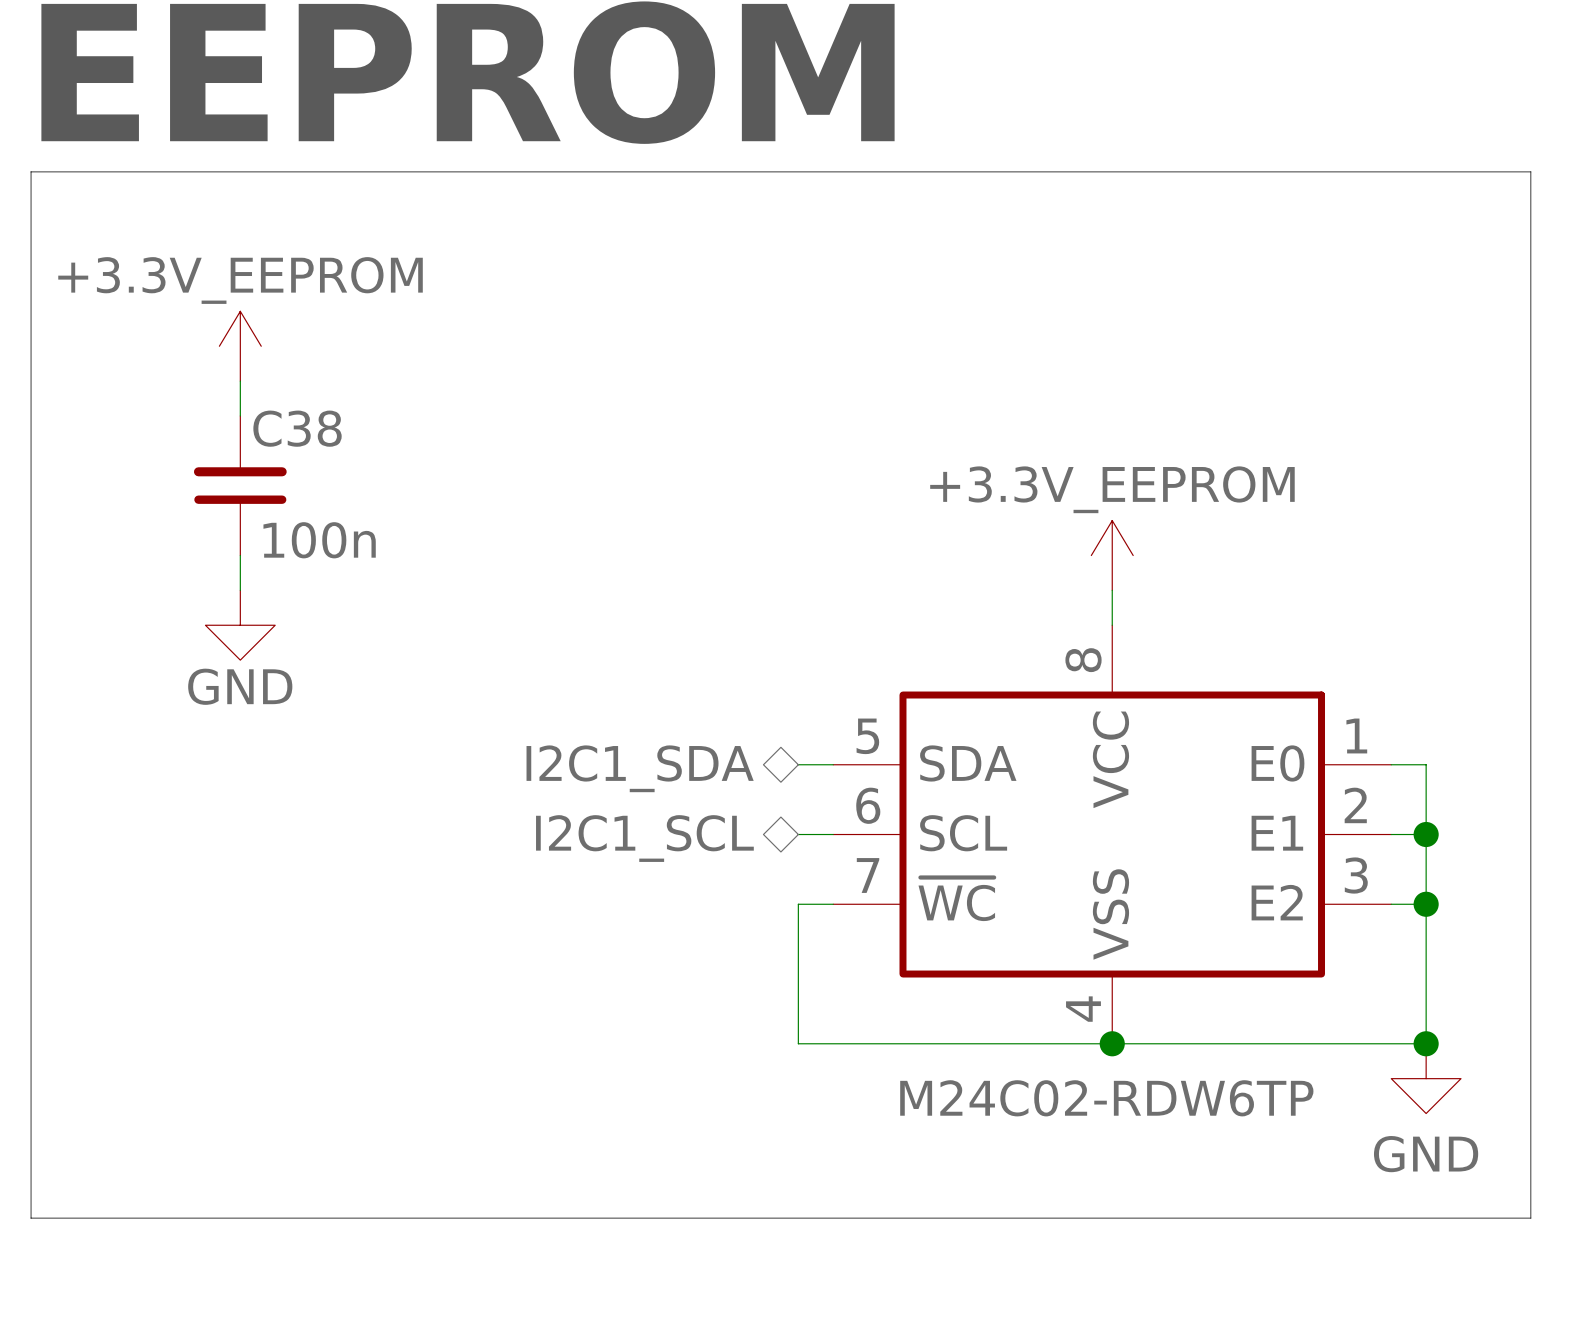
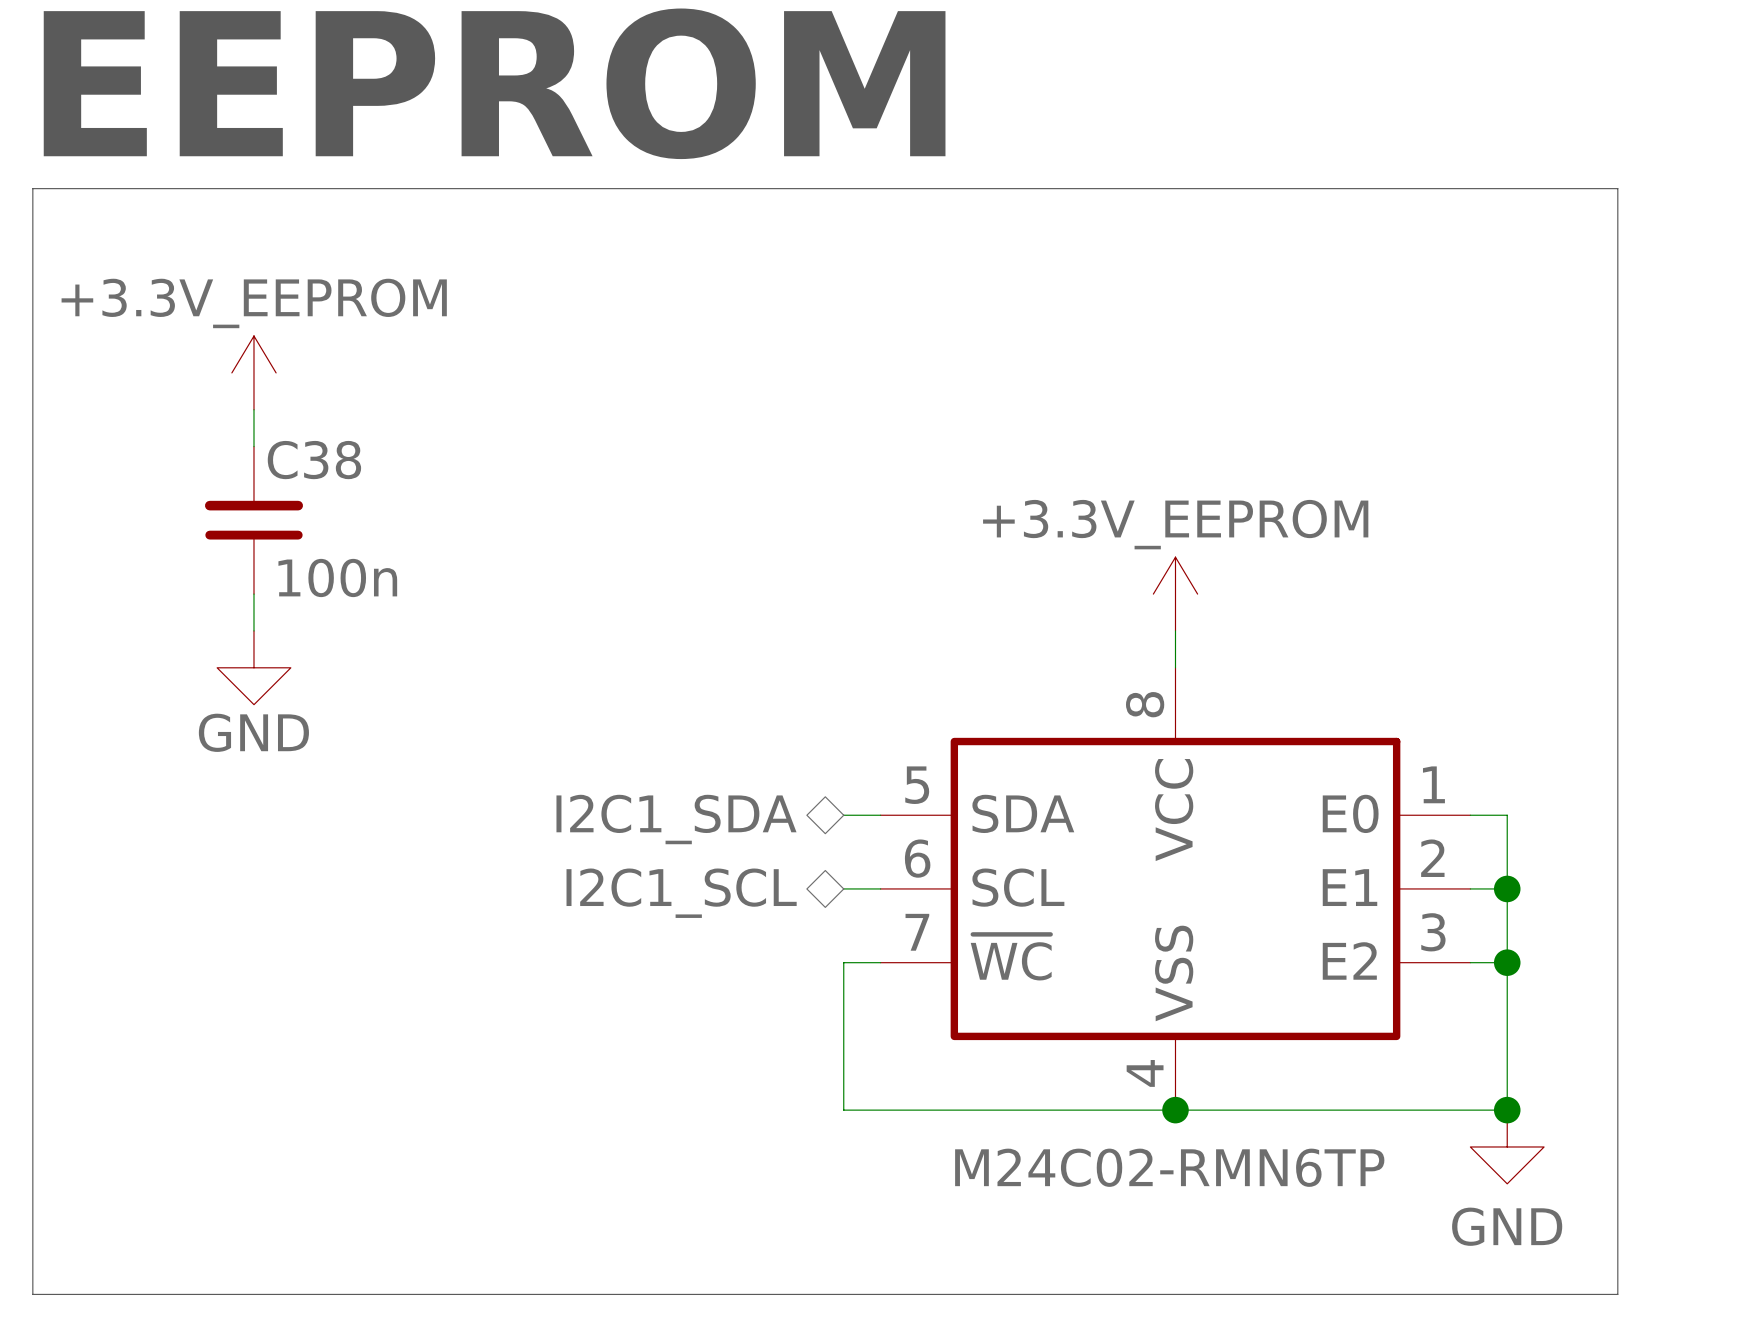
part value: M24C02-RDW6TP (1106, 1098) -> M24C02-RMN6TP (1169, 1167)

